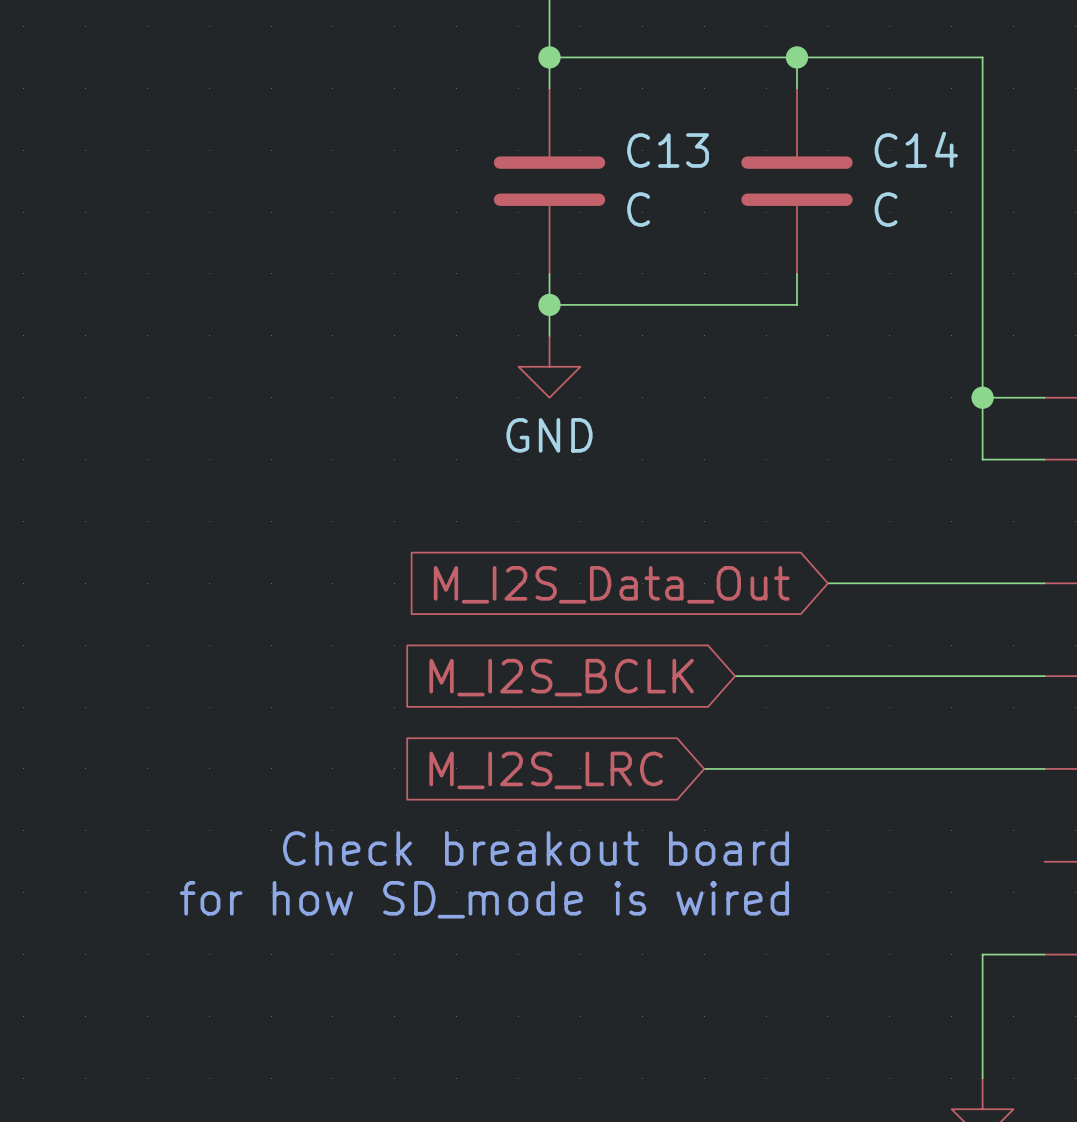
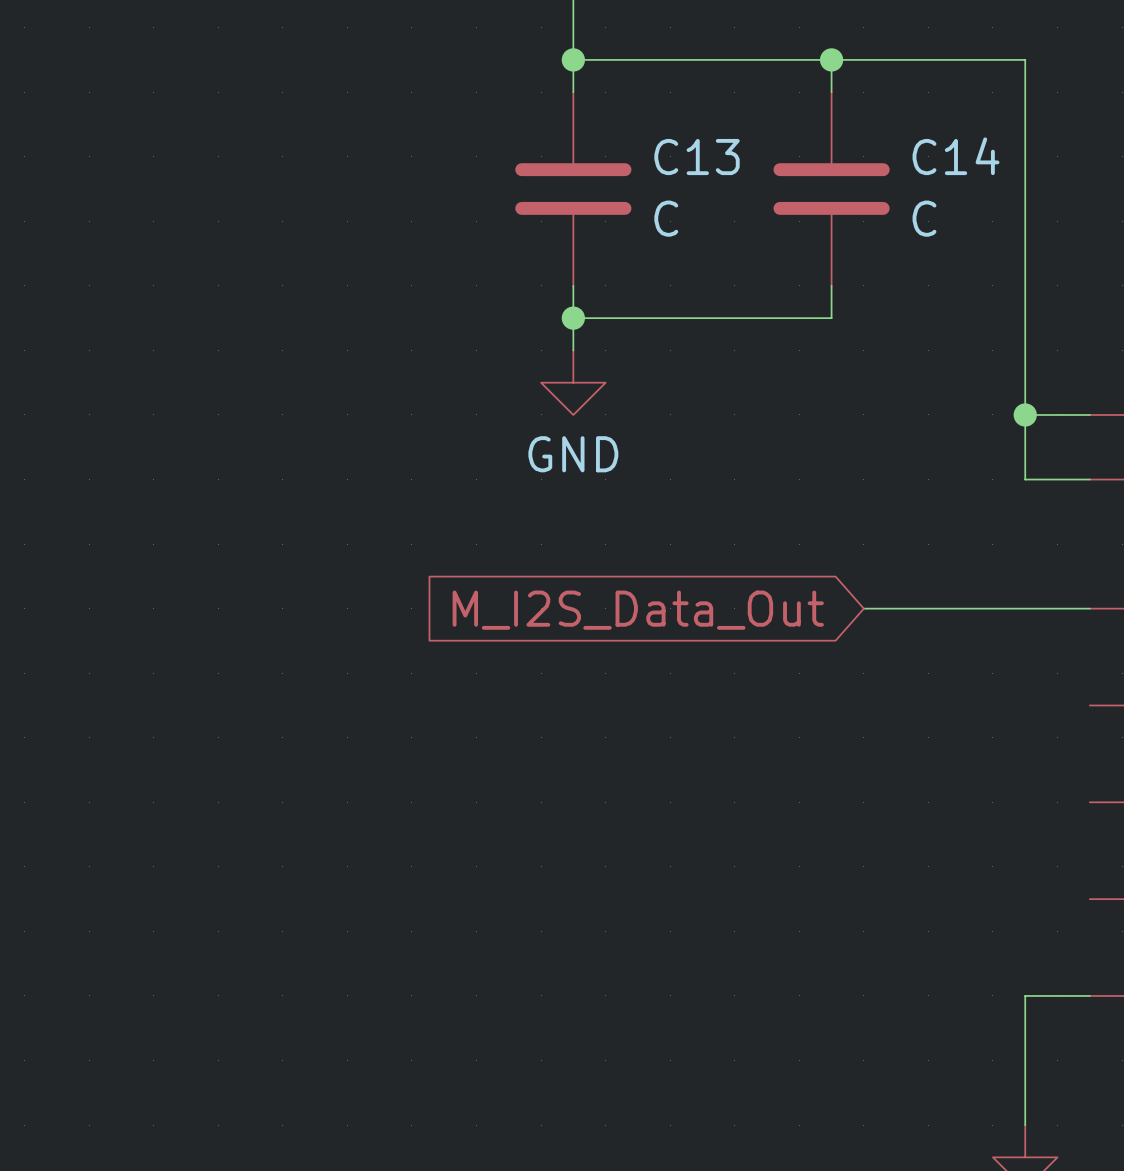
wire: (735, 676) (1044, 676) -> none
global label: M_I2S_BCLK (561, 677) -> none
wire: (704, 768) (1044, 768) -> none
global label: M_I2S_LRC (546, 770) -> none
text: Check breakout board (536, 848) -> none
text: for how SD_mode is wired (484, 899) -> none

